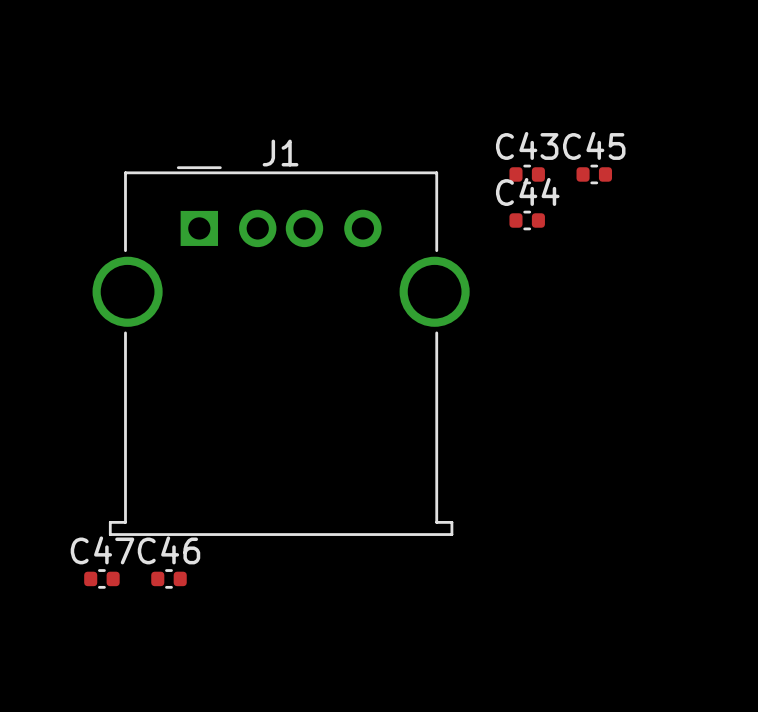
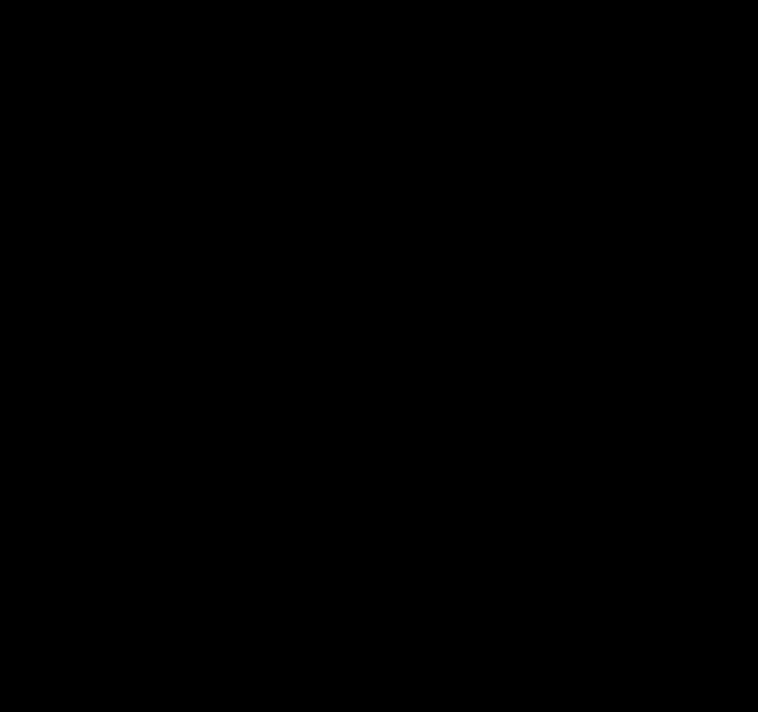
C43: (527, 174) -> none
C45: (594, 174) -> none
C44: (527, 220) -> none
J1: (281, 351) -> none
C47: (101, 578) -> none
C46: (168, 578) -> none

